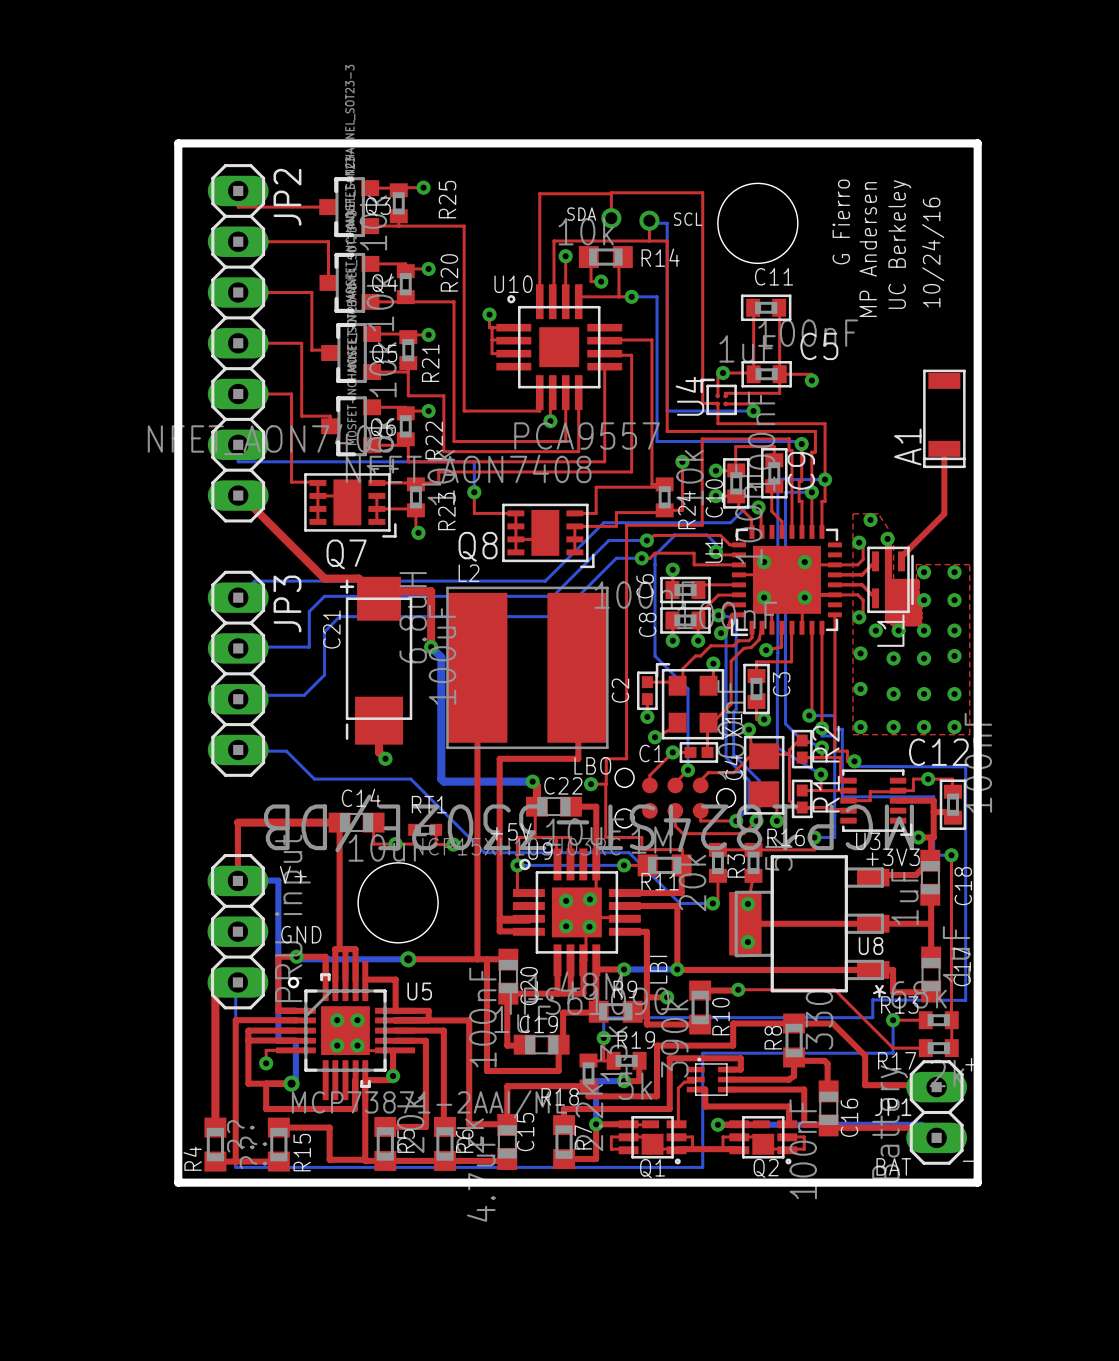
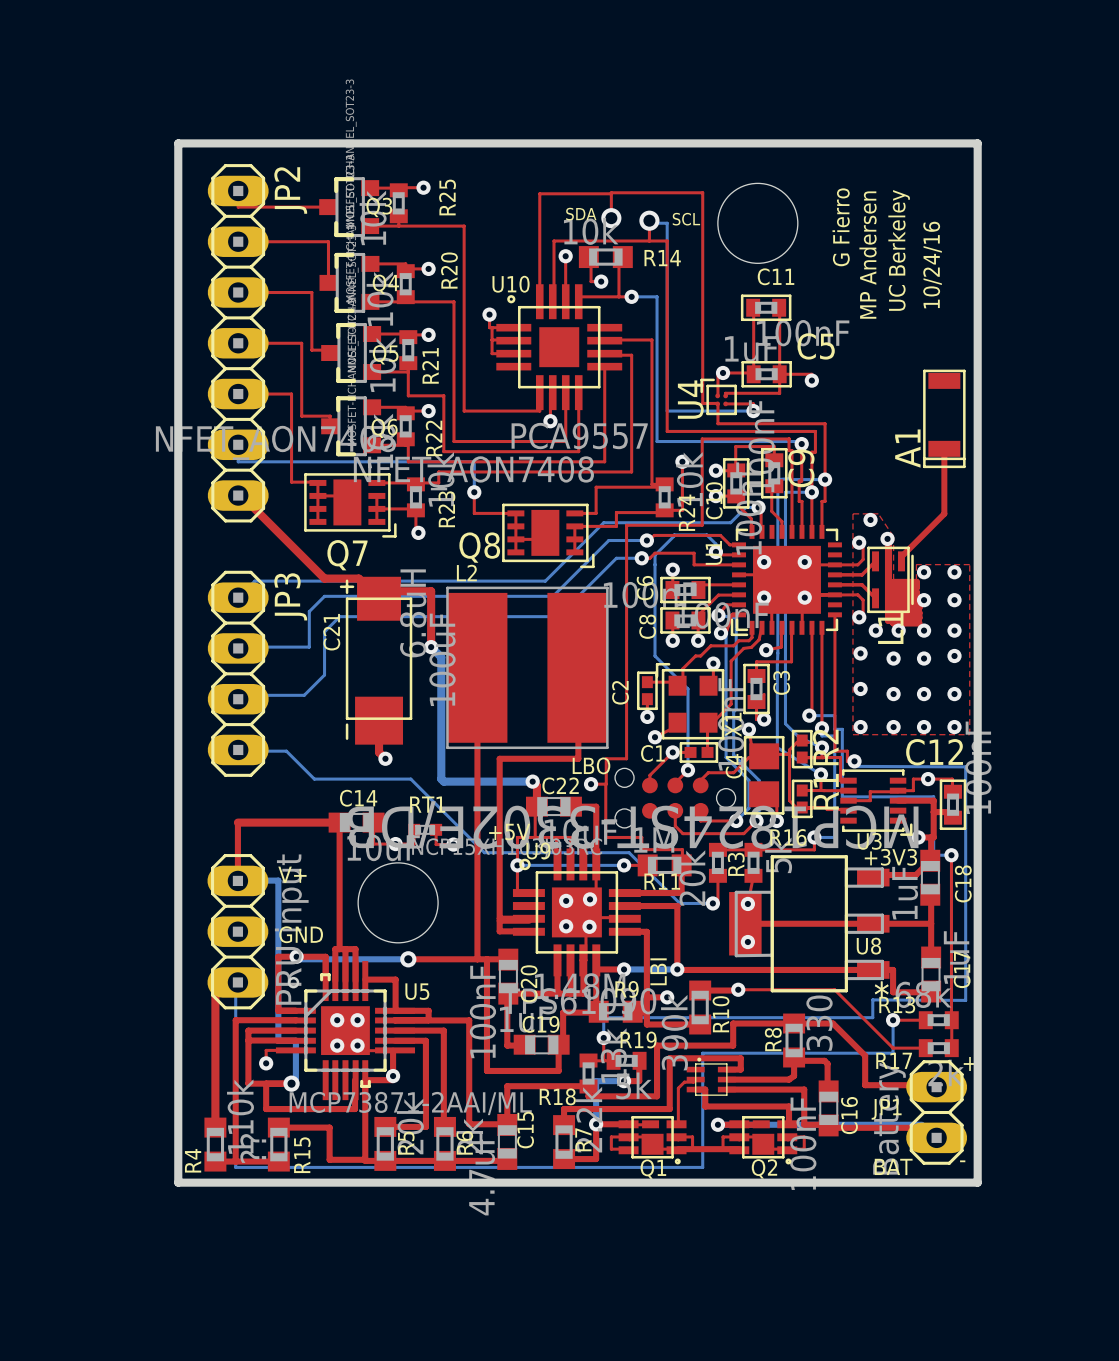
R4 value: ?? (240, 1136) -> 110k (240, 1116)

